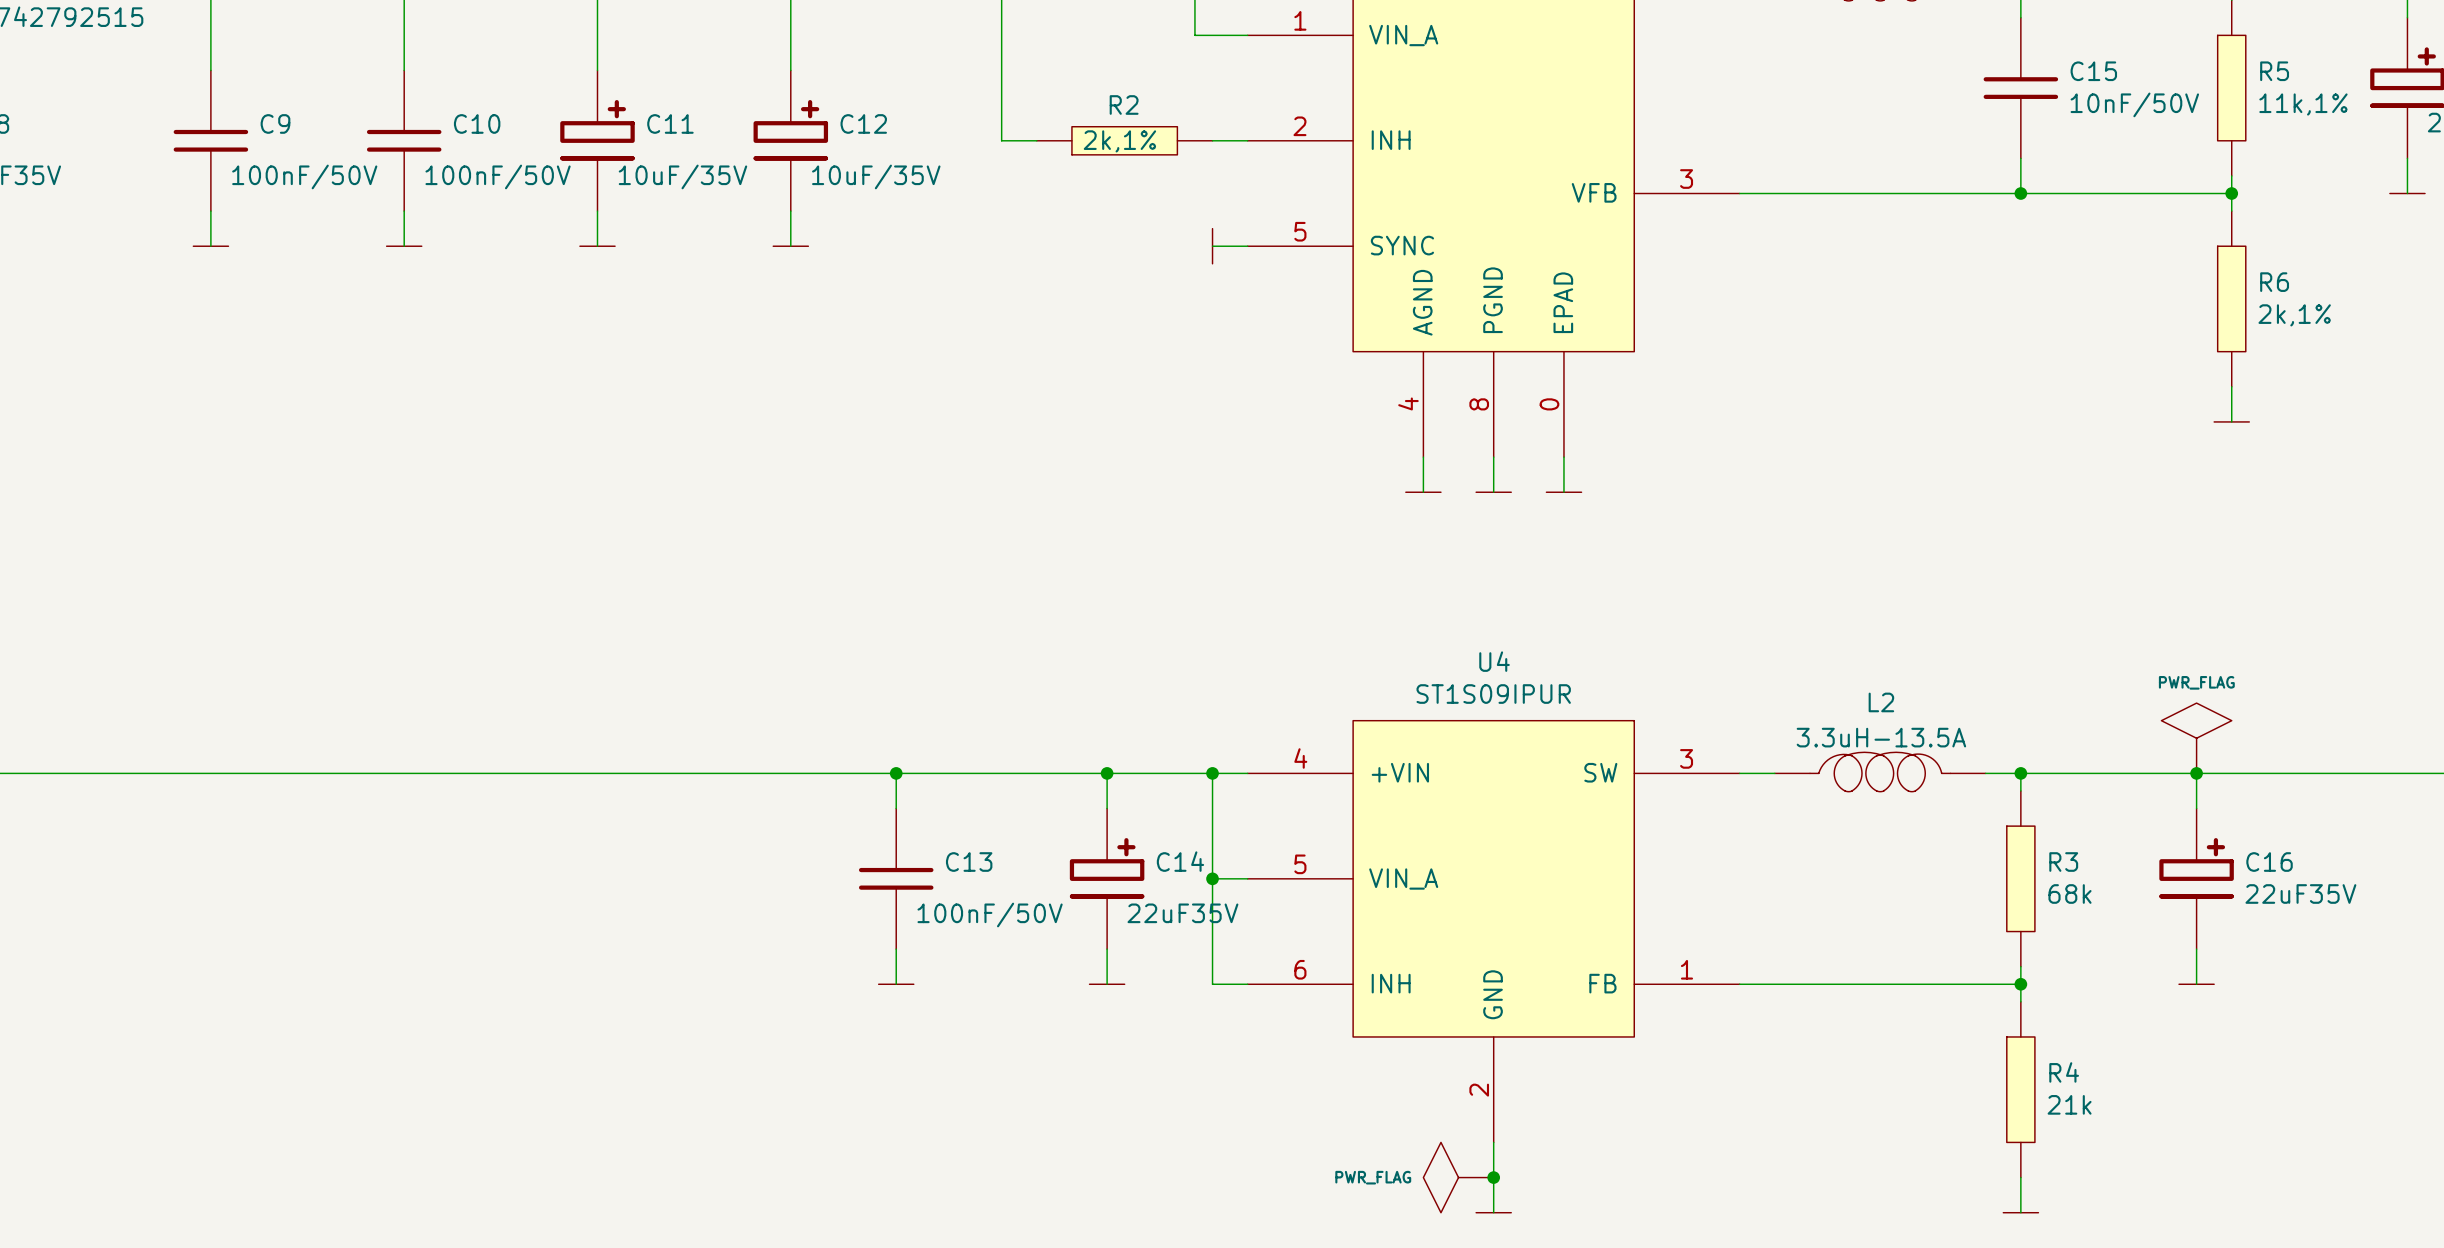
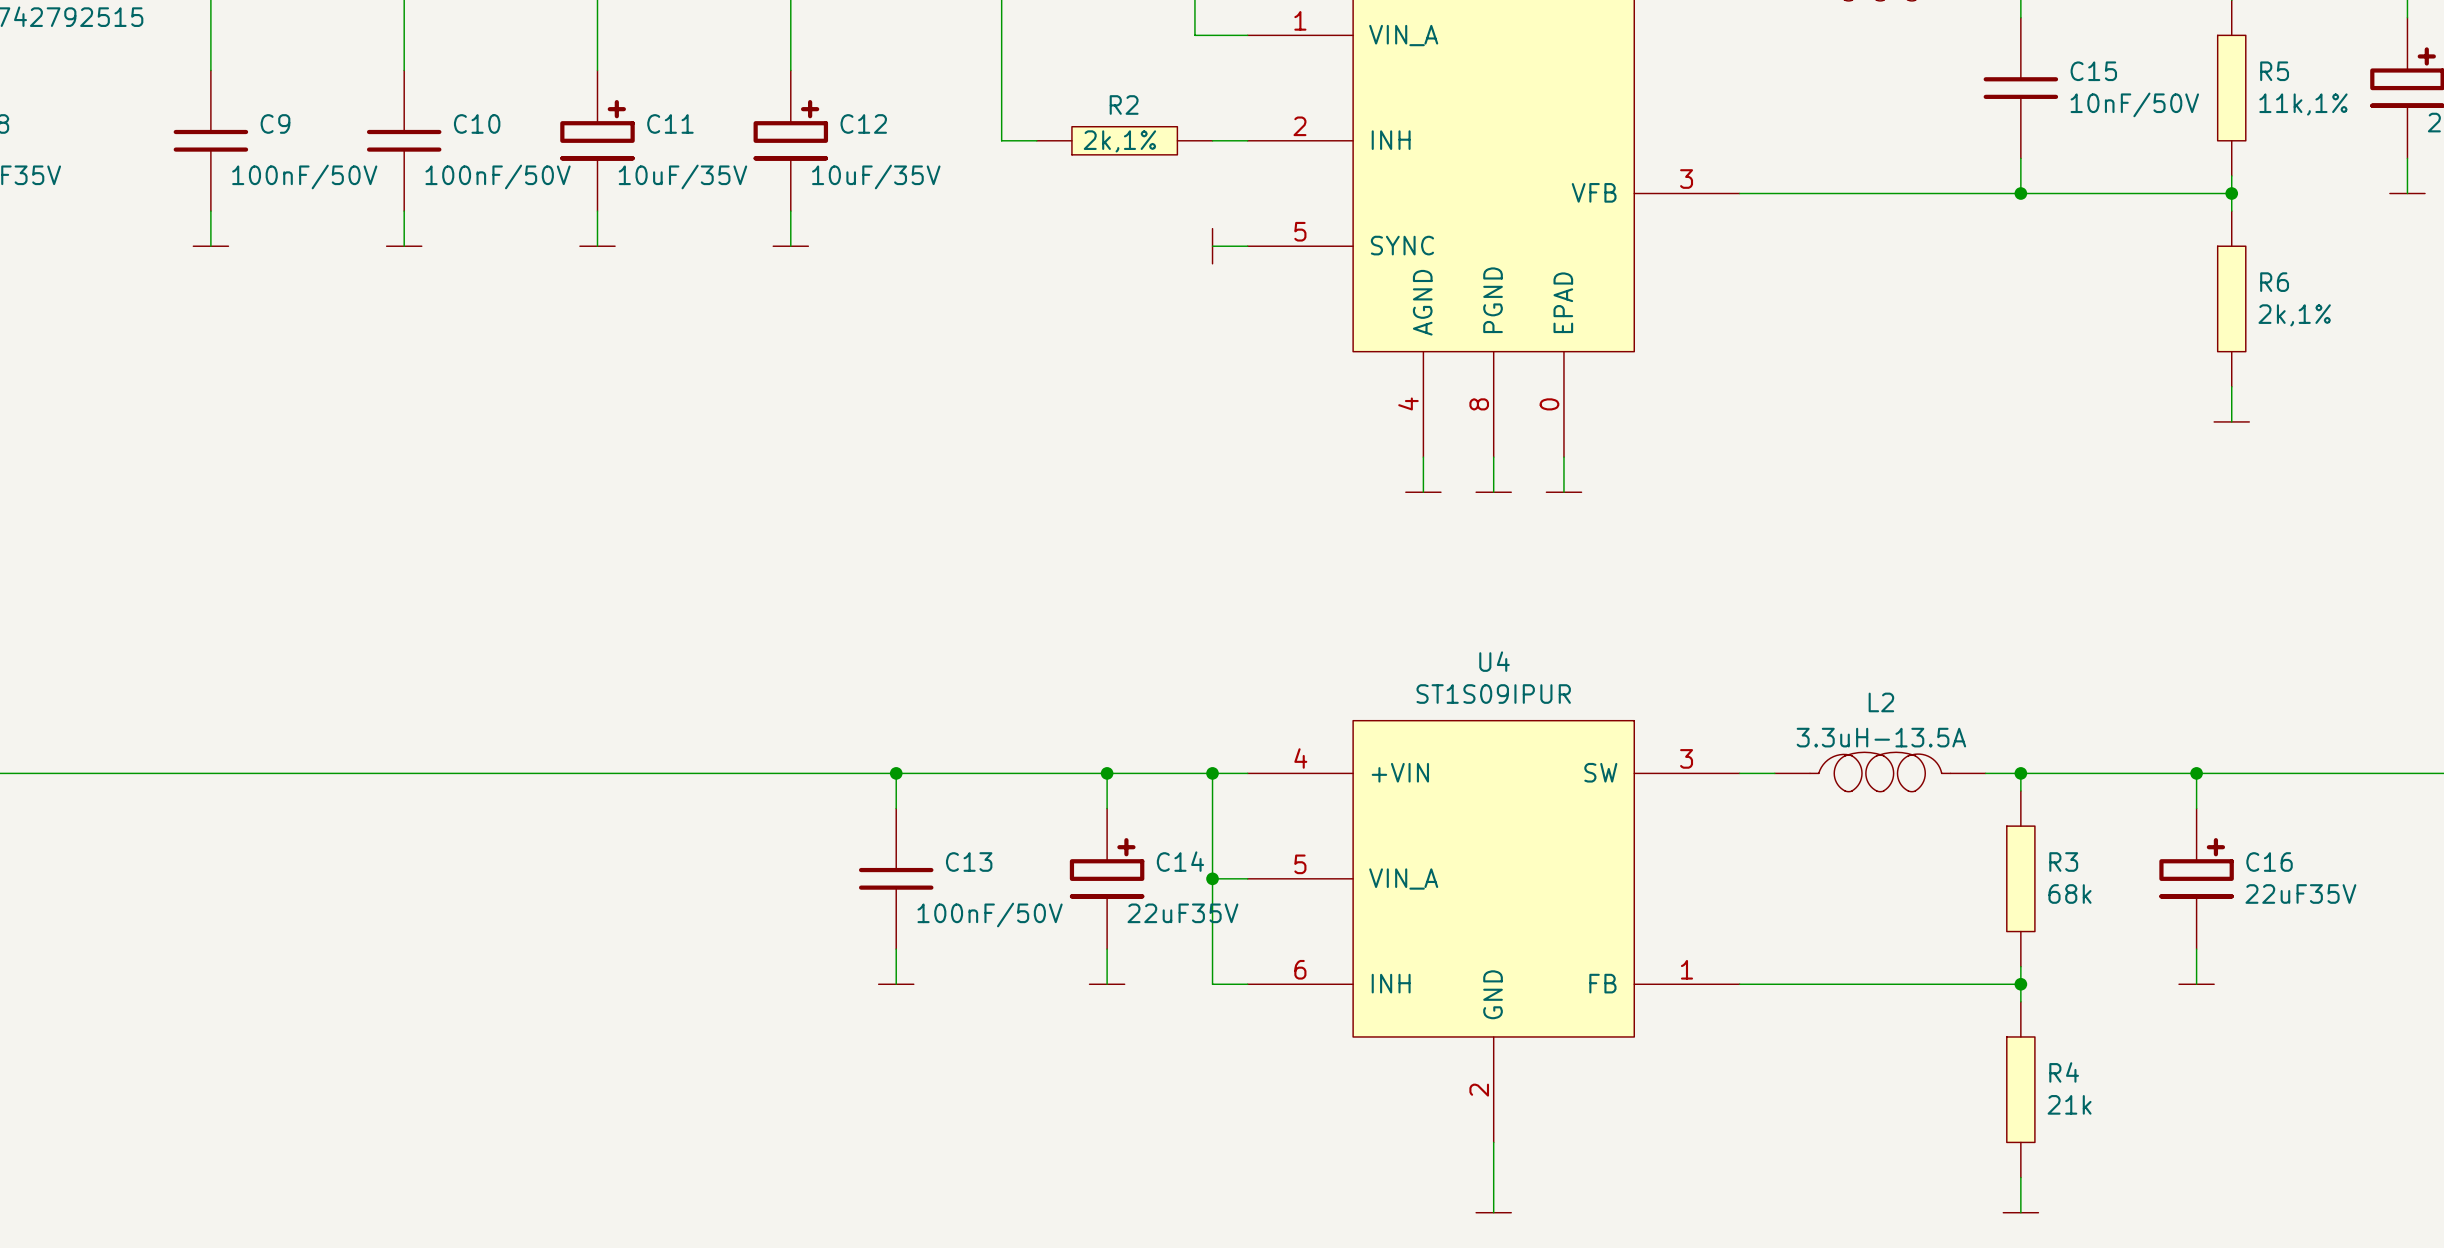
power symbol: PWR_FLAG (2196, 738) -> none
power symbol: PWR_FLAG (1458, 1177) -> none
junction: (1493, 1177) -> none

